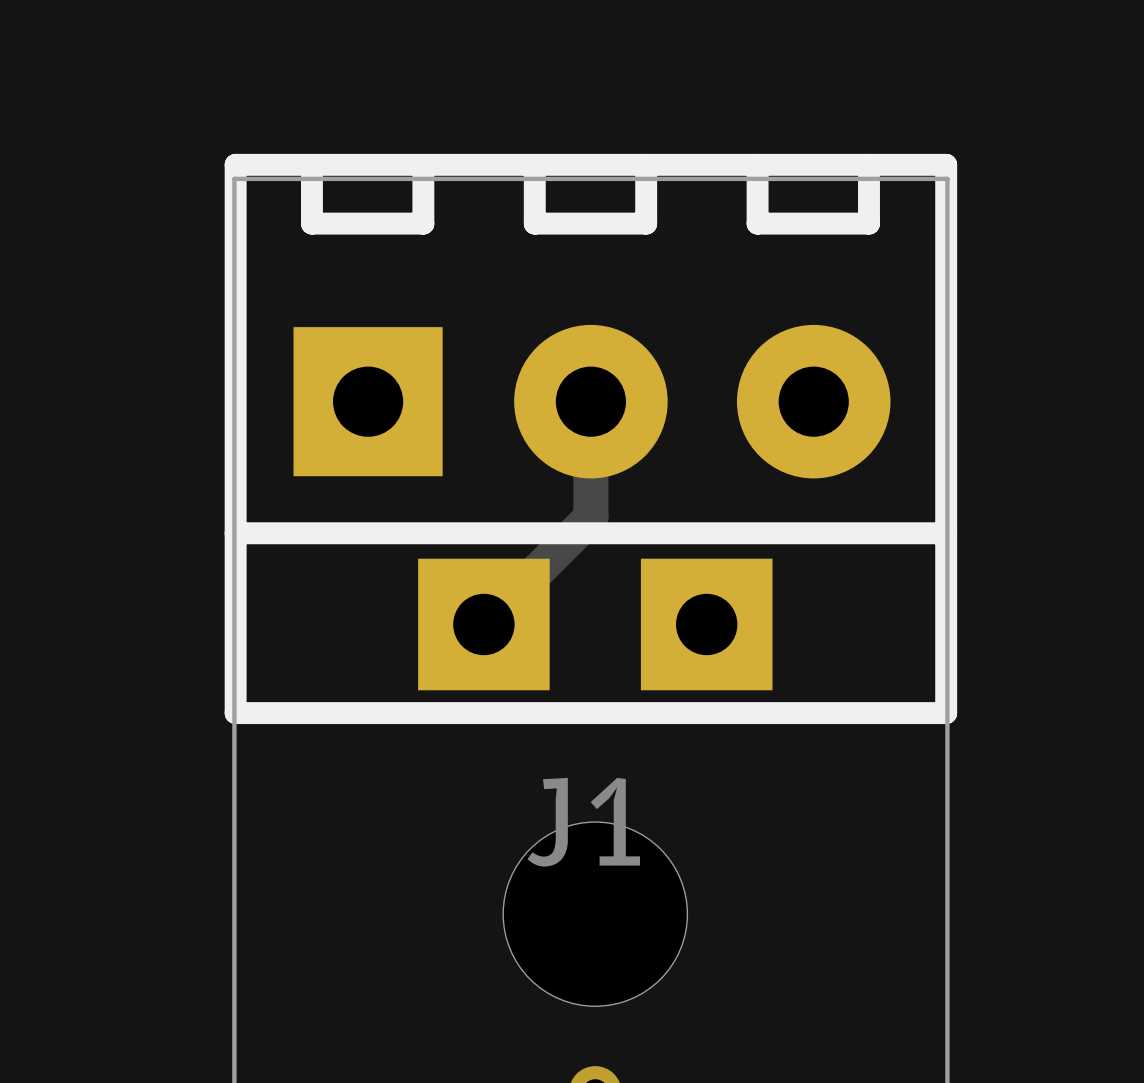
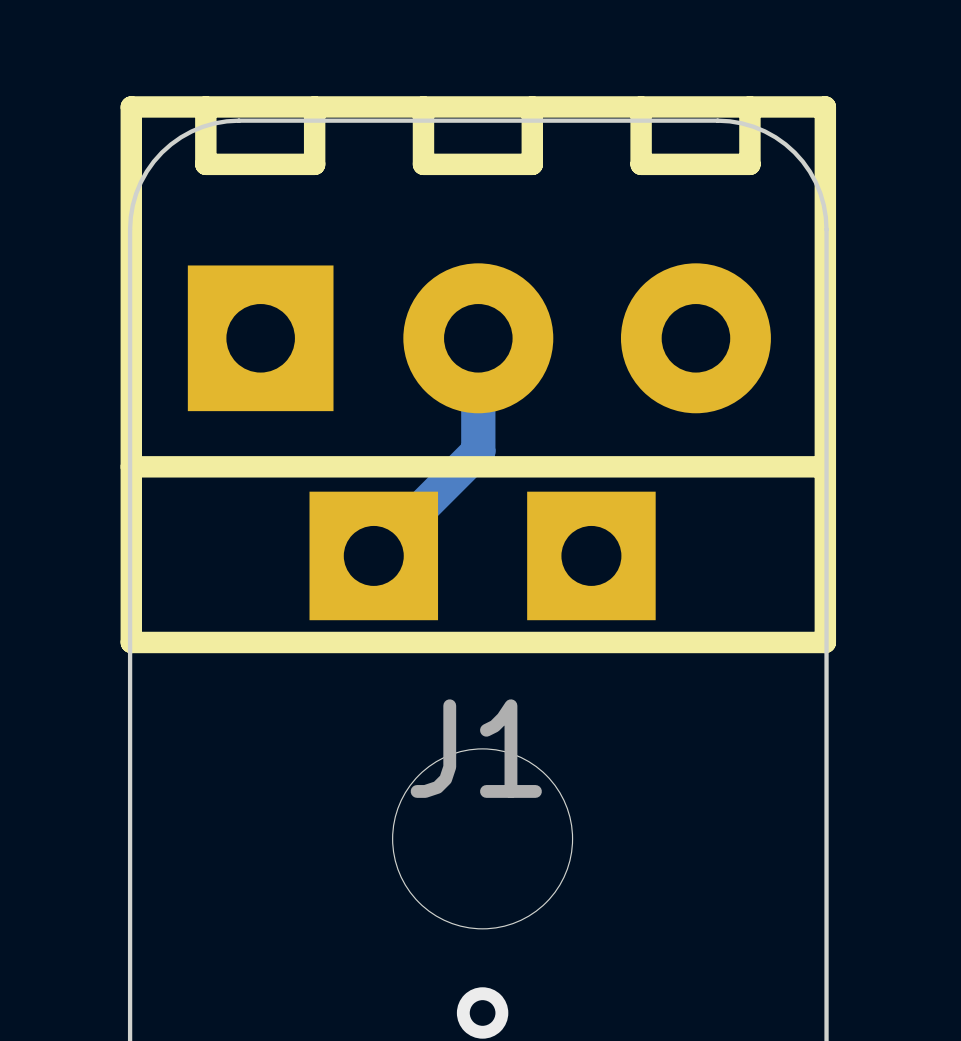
board edge: (345, 178) (234, 178) (234, 290) -> (238, 120) (214, 123) (191, 131) (161, 152) (140, 182) (132, 205) (130, 229)
board edge: (836, 178) (947, 178) (947, 290) -> (717, 120) (741, 123) (764, 131) (794, 152) (815, 182) (823, 205) (826, 229)

